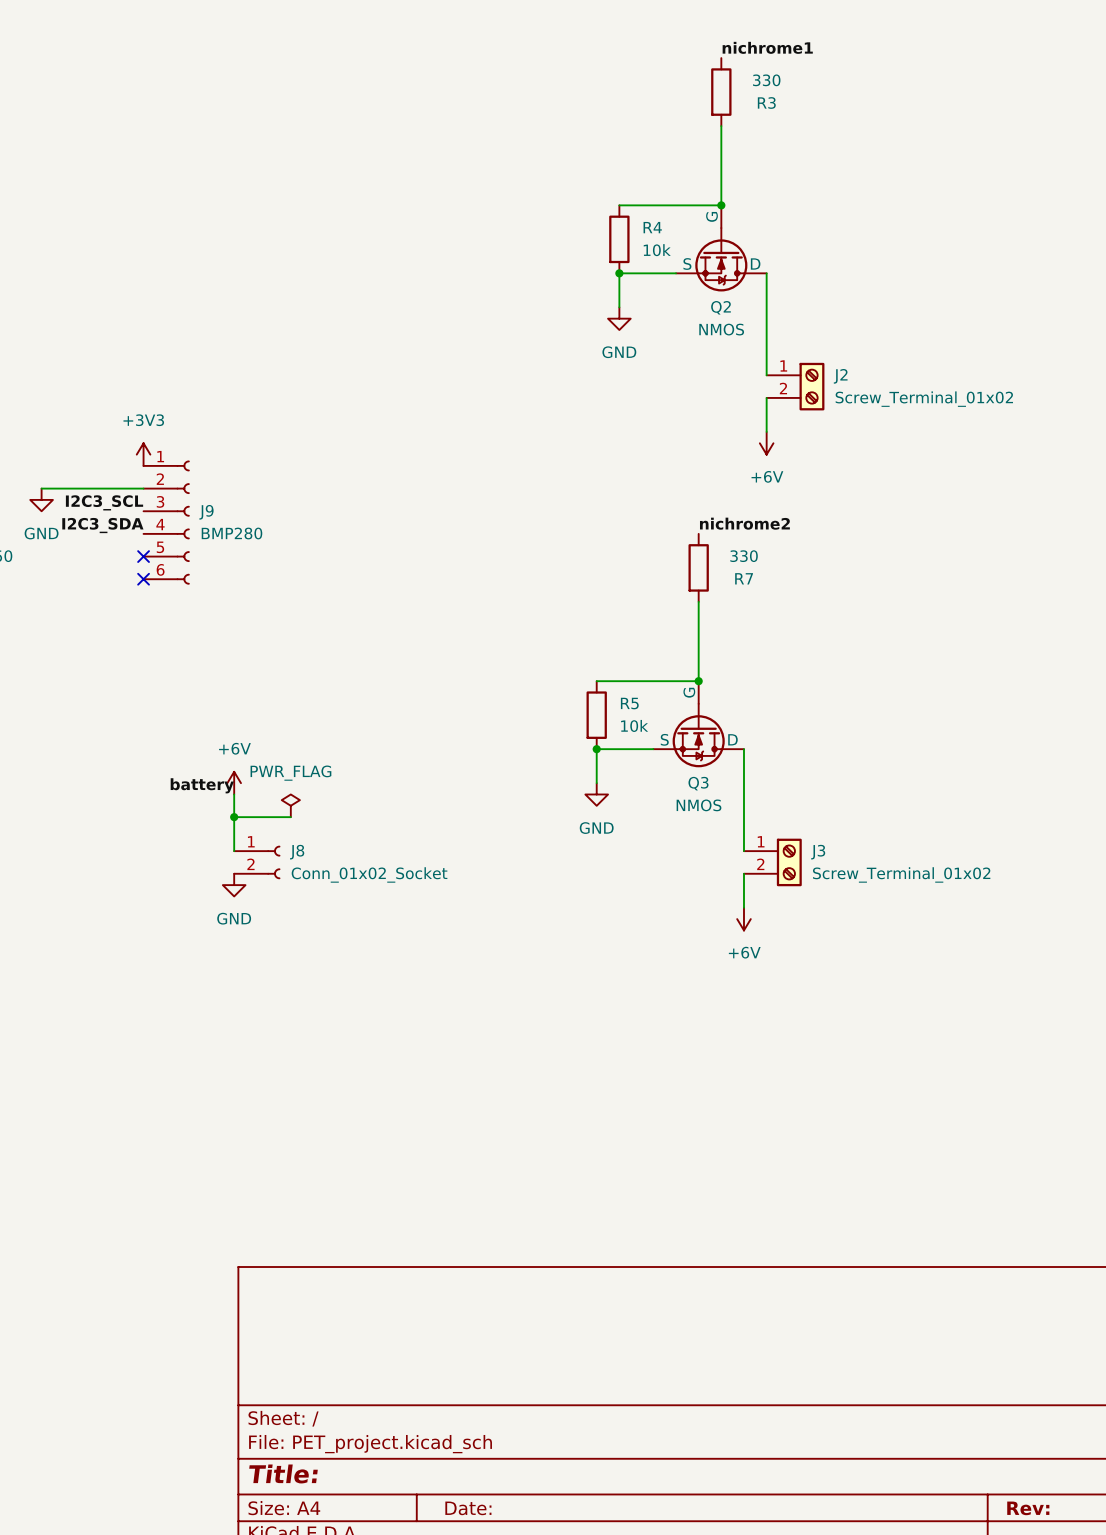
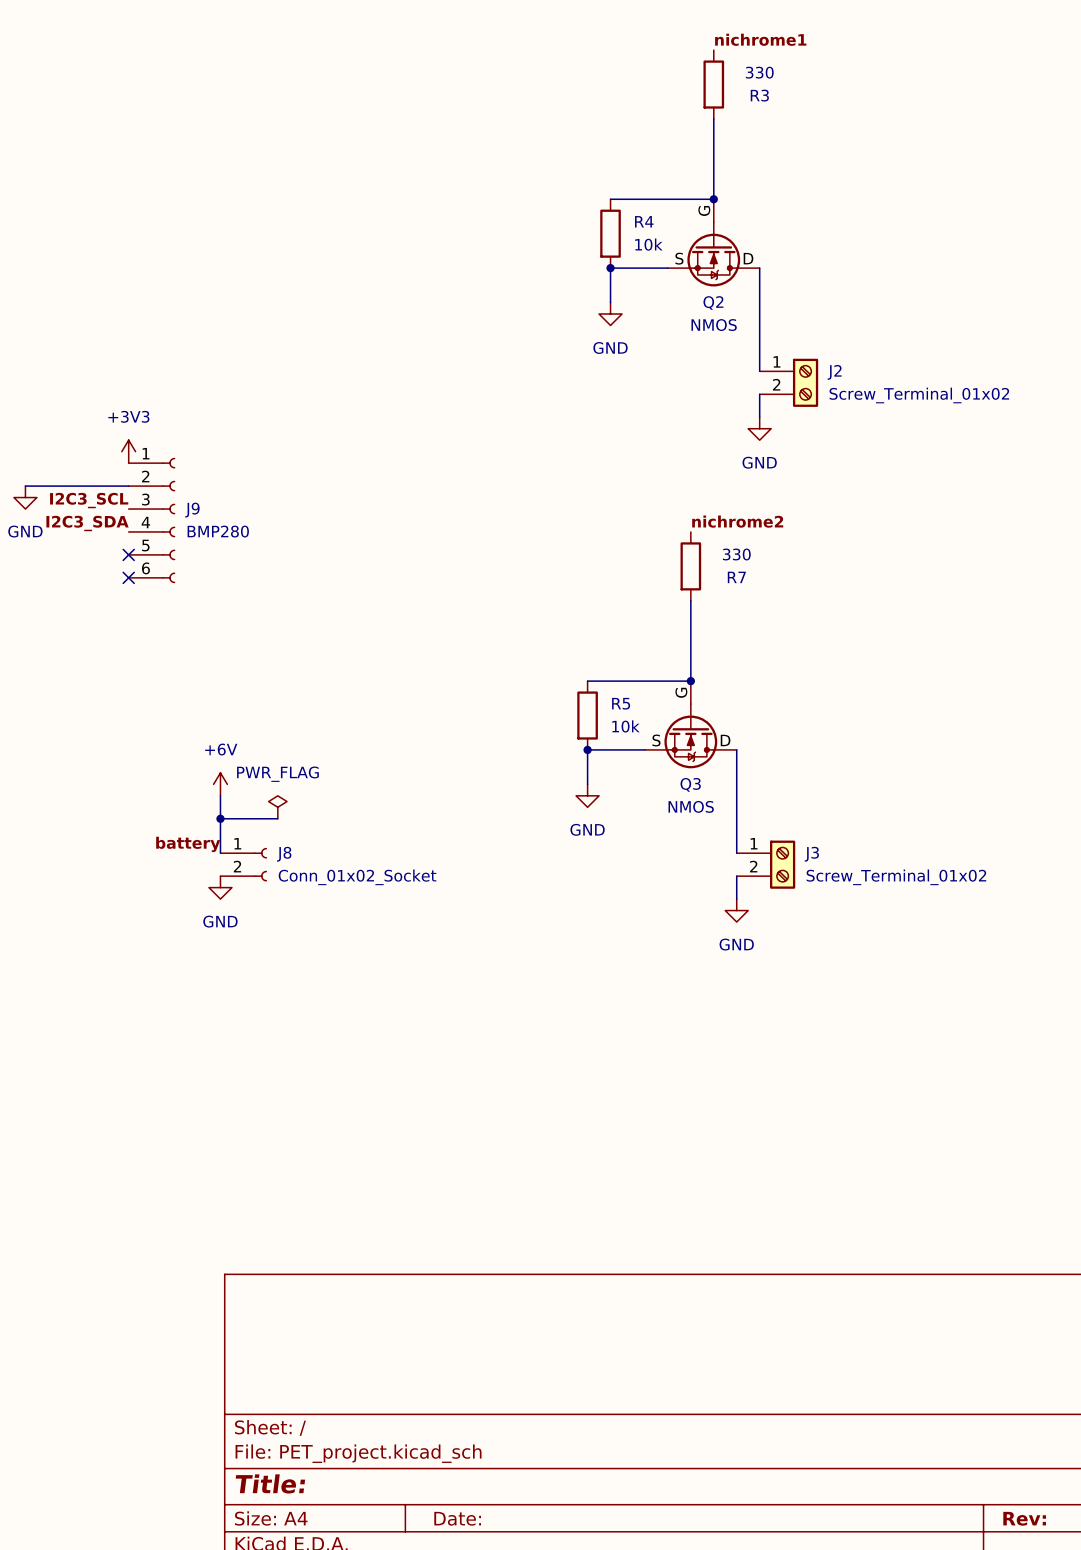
power symbol: none -> GND (759, 428)
power symbol: +6V (766, 443) -> none
label position: battery (202, 785) -> battery (188, 844)
power symbol: none -> GND (736, 910)
power symbol: +6V (743, 919) -> none

